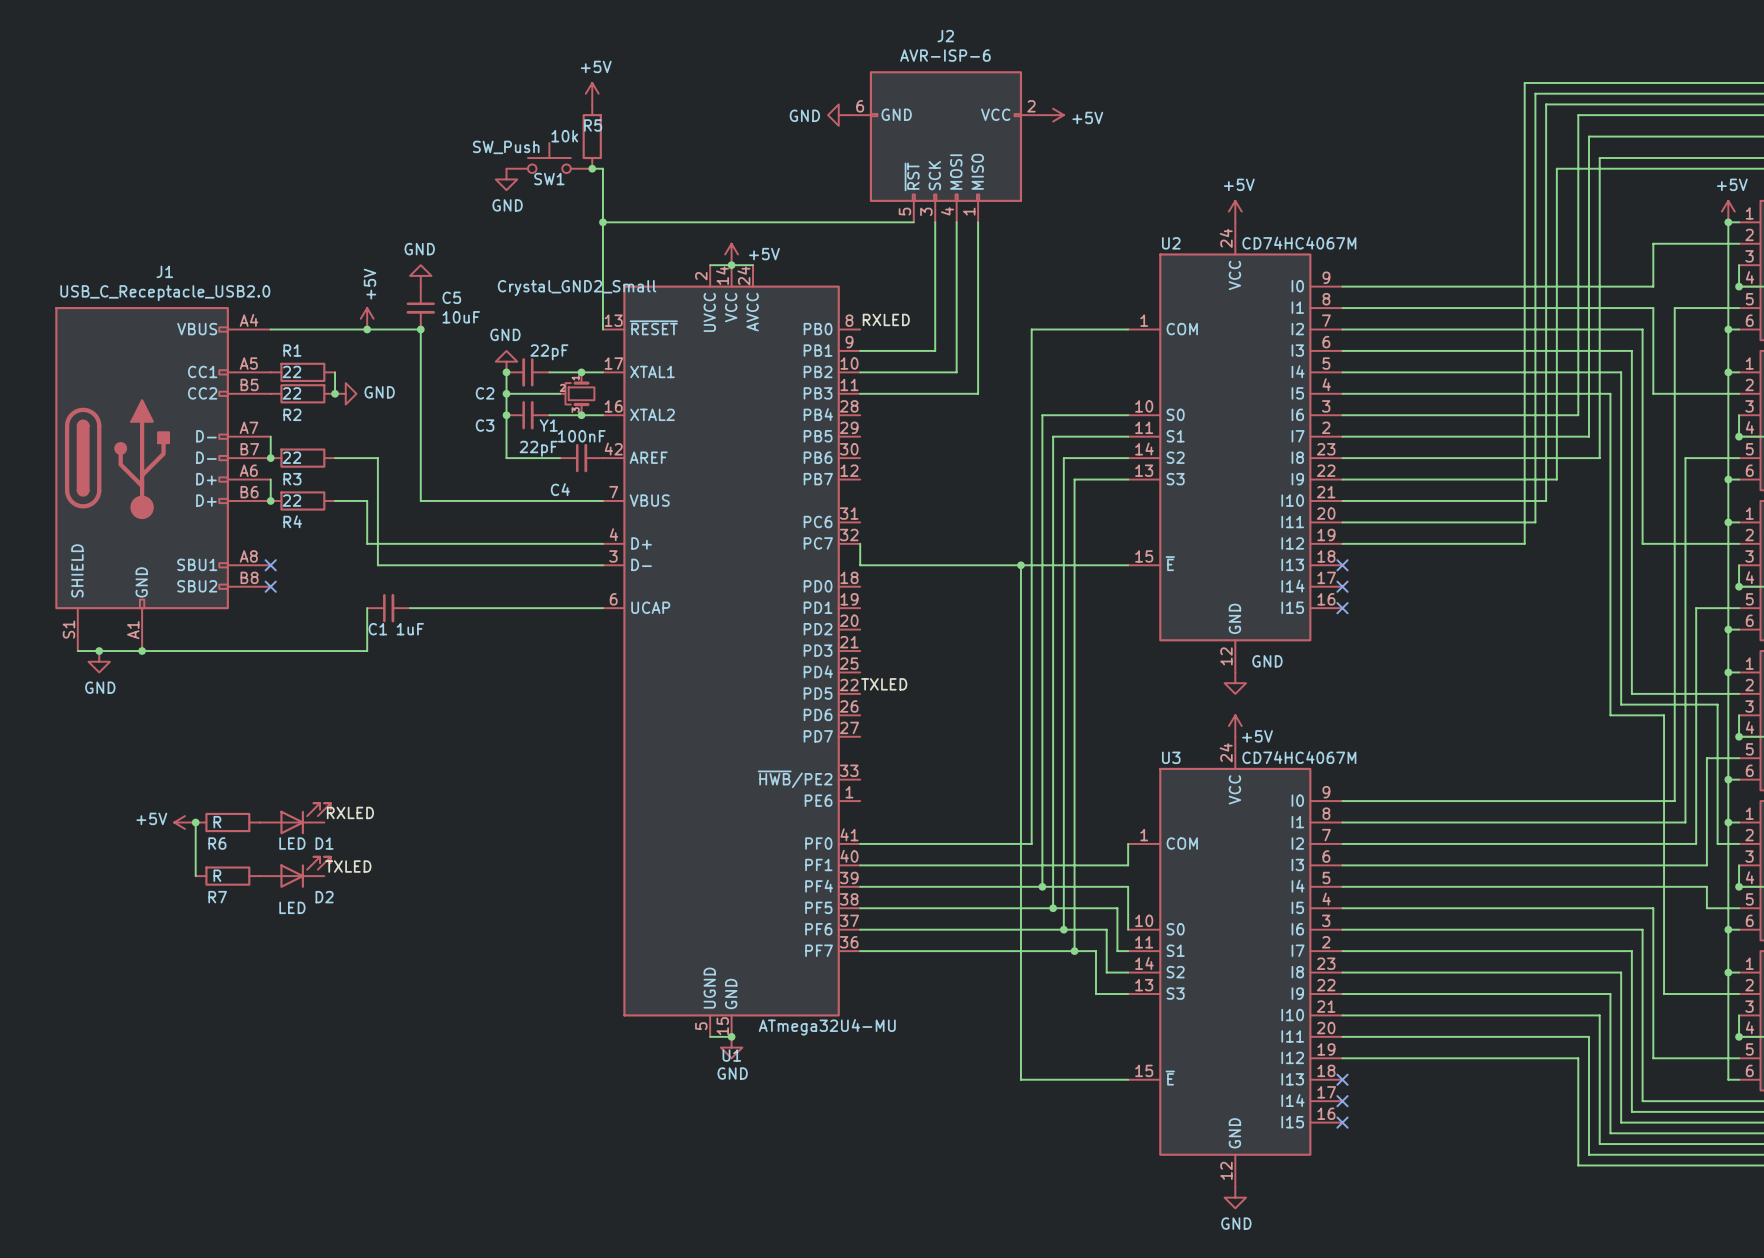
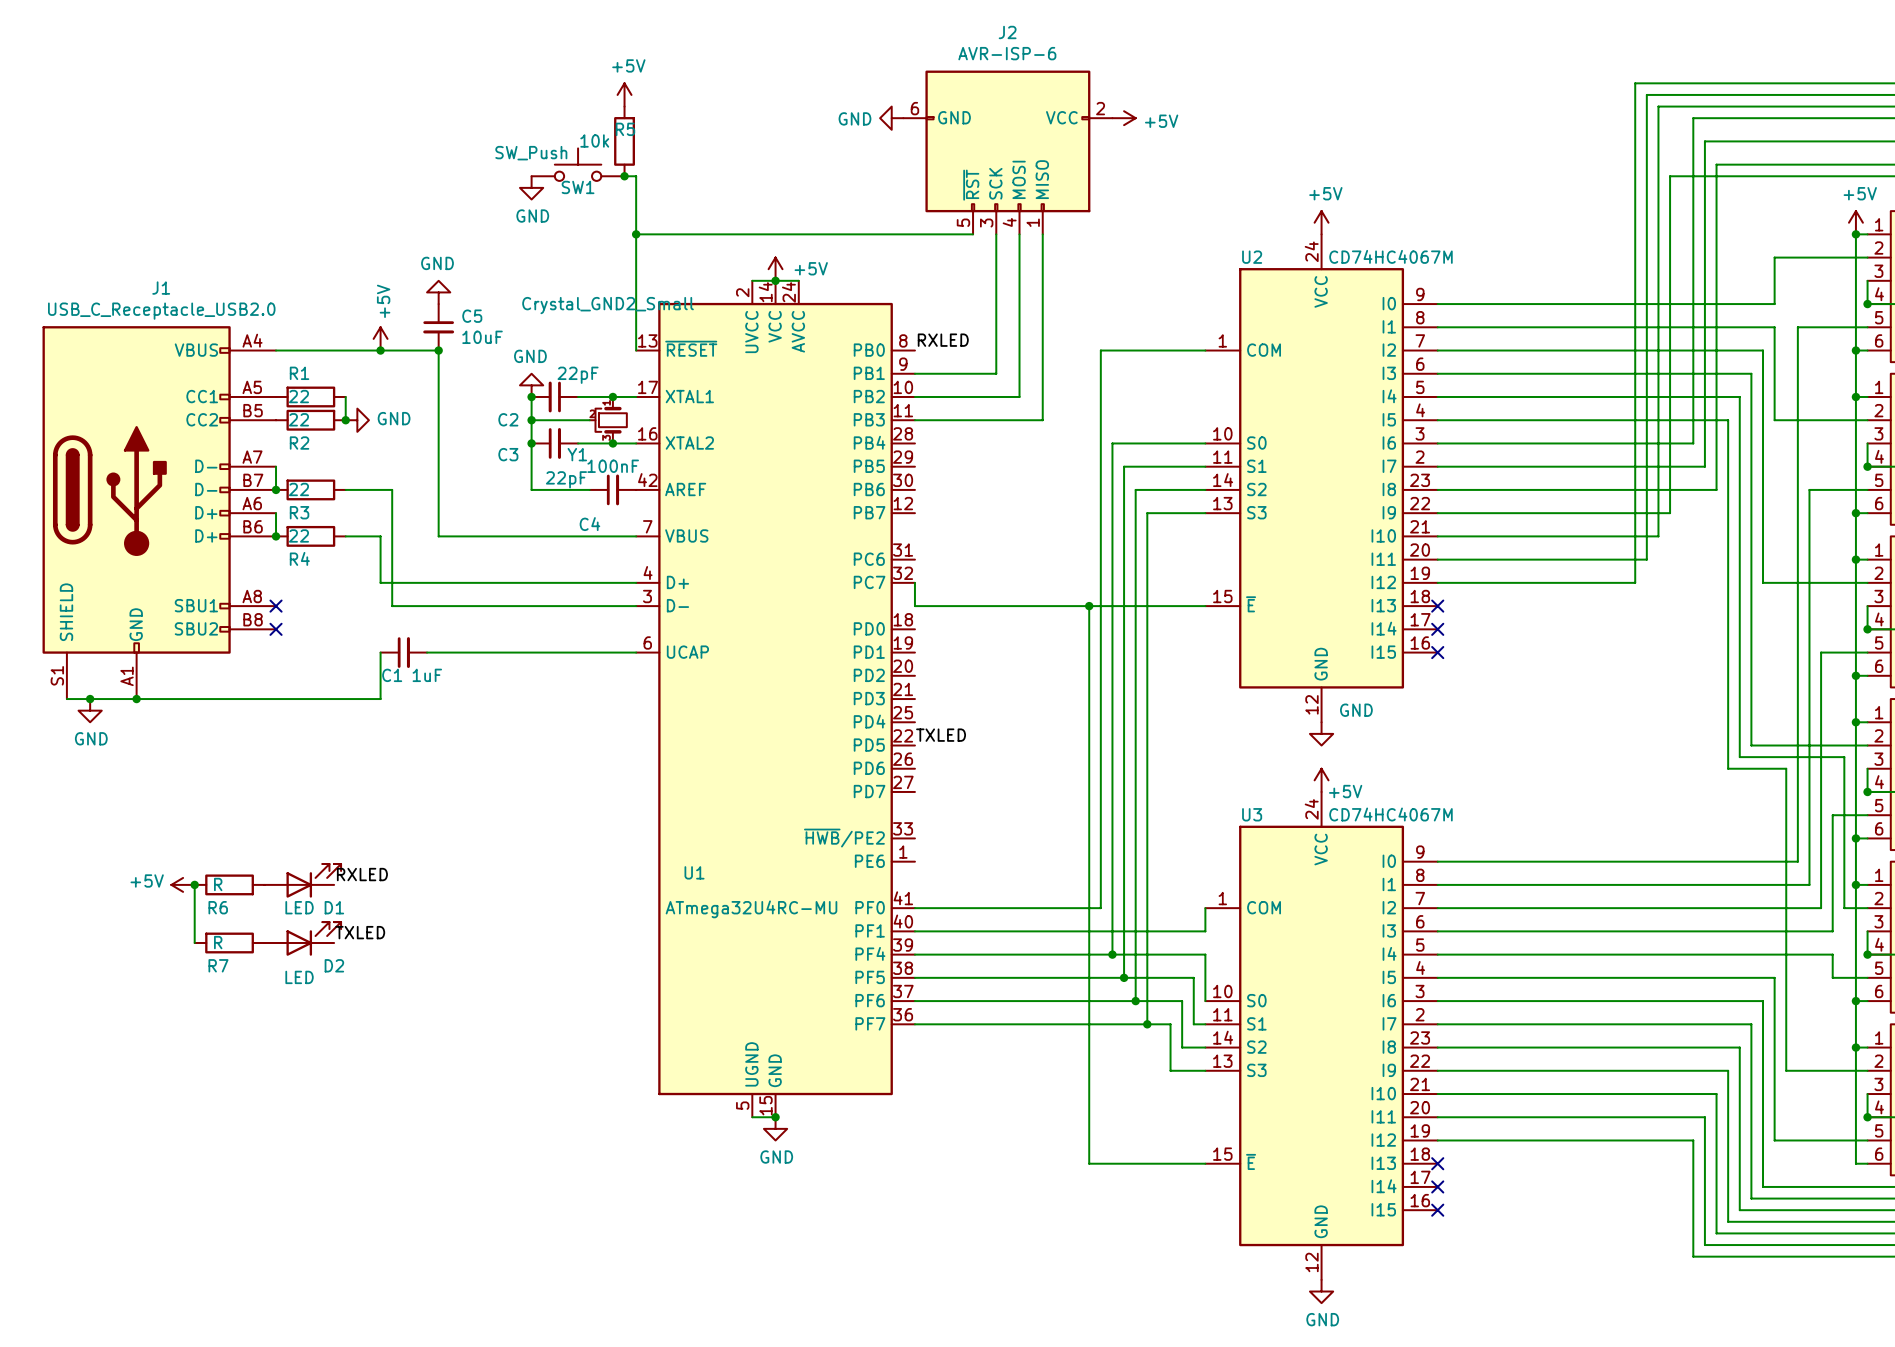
U1 value: ATmega32U4-MU (827, 1027) -> ATmega32U4RC-MU (751, 909)
U1 name position: U1 (731, 1055) -> U1 (694, 872)

